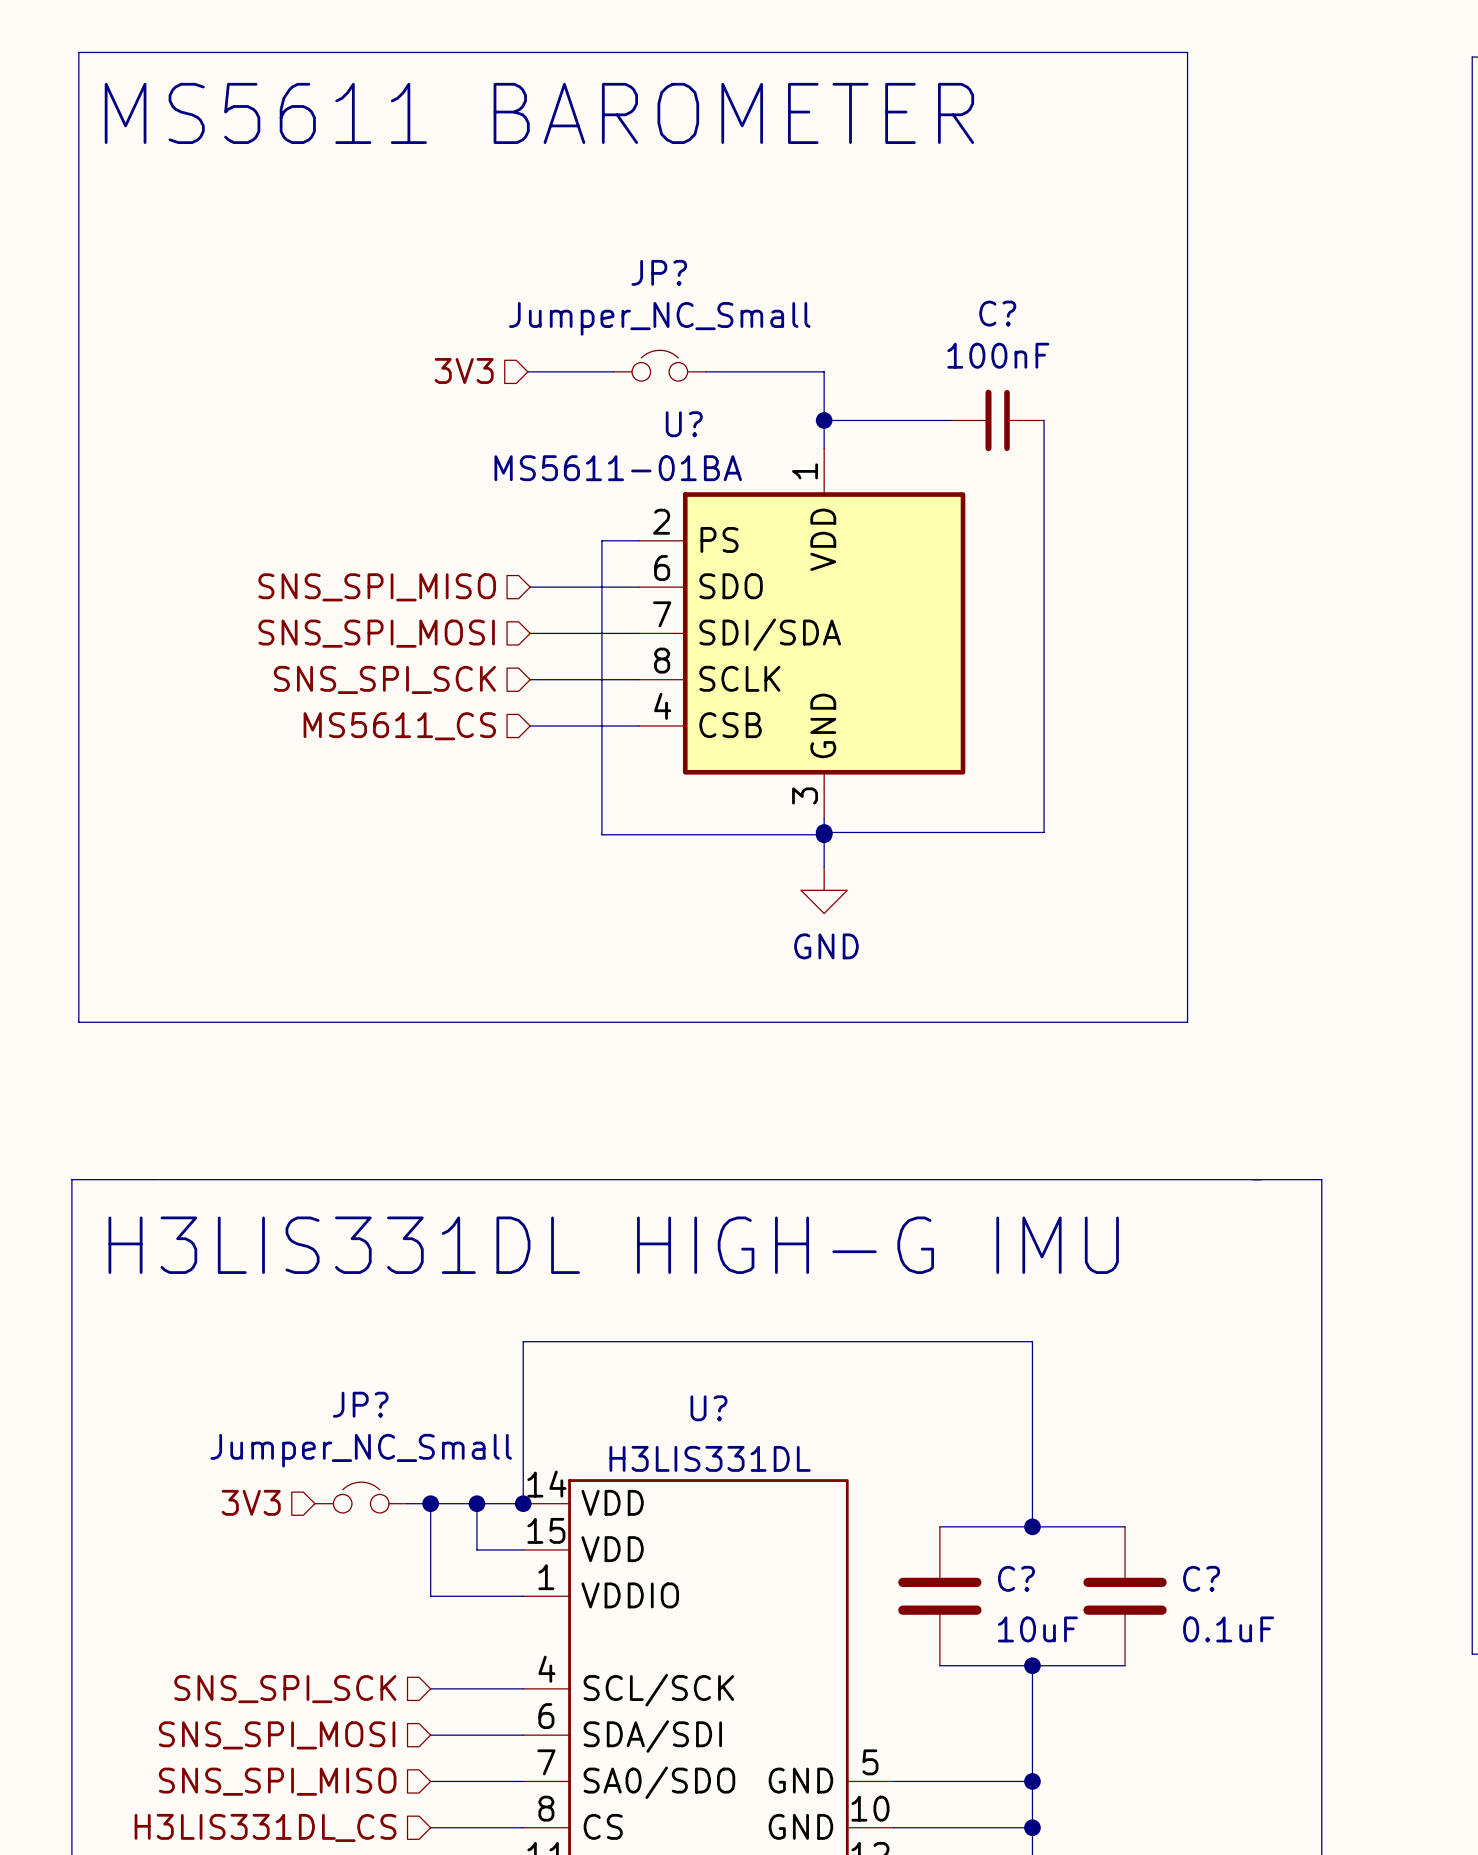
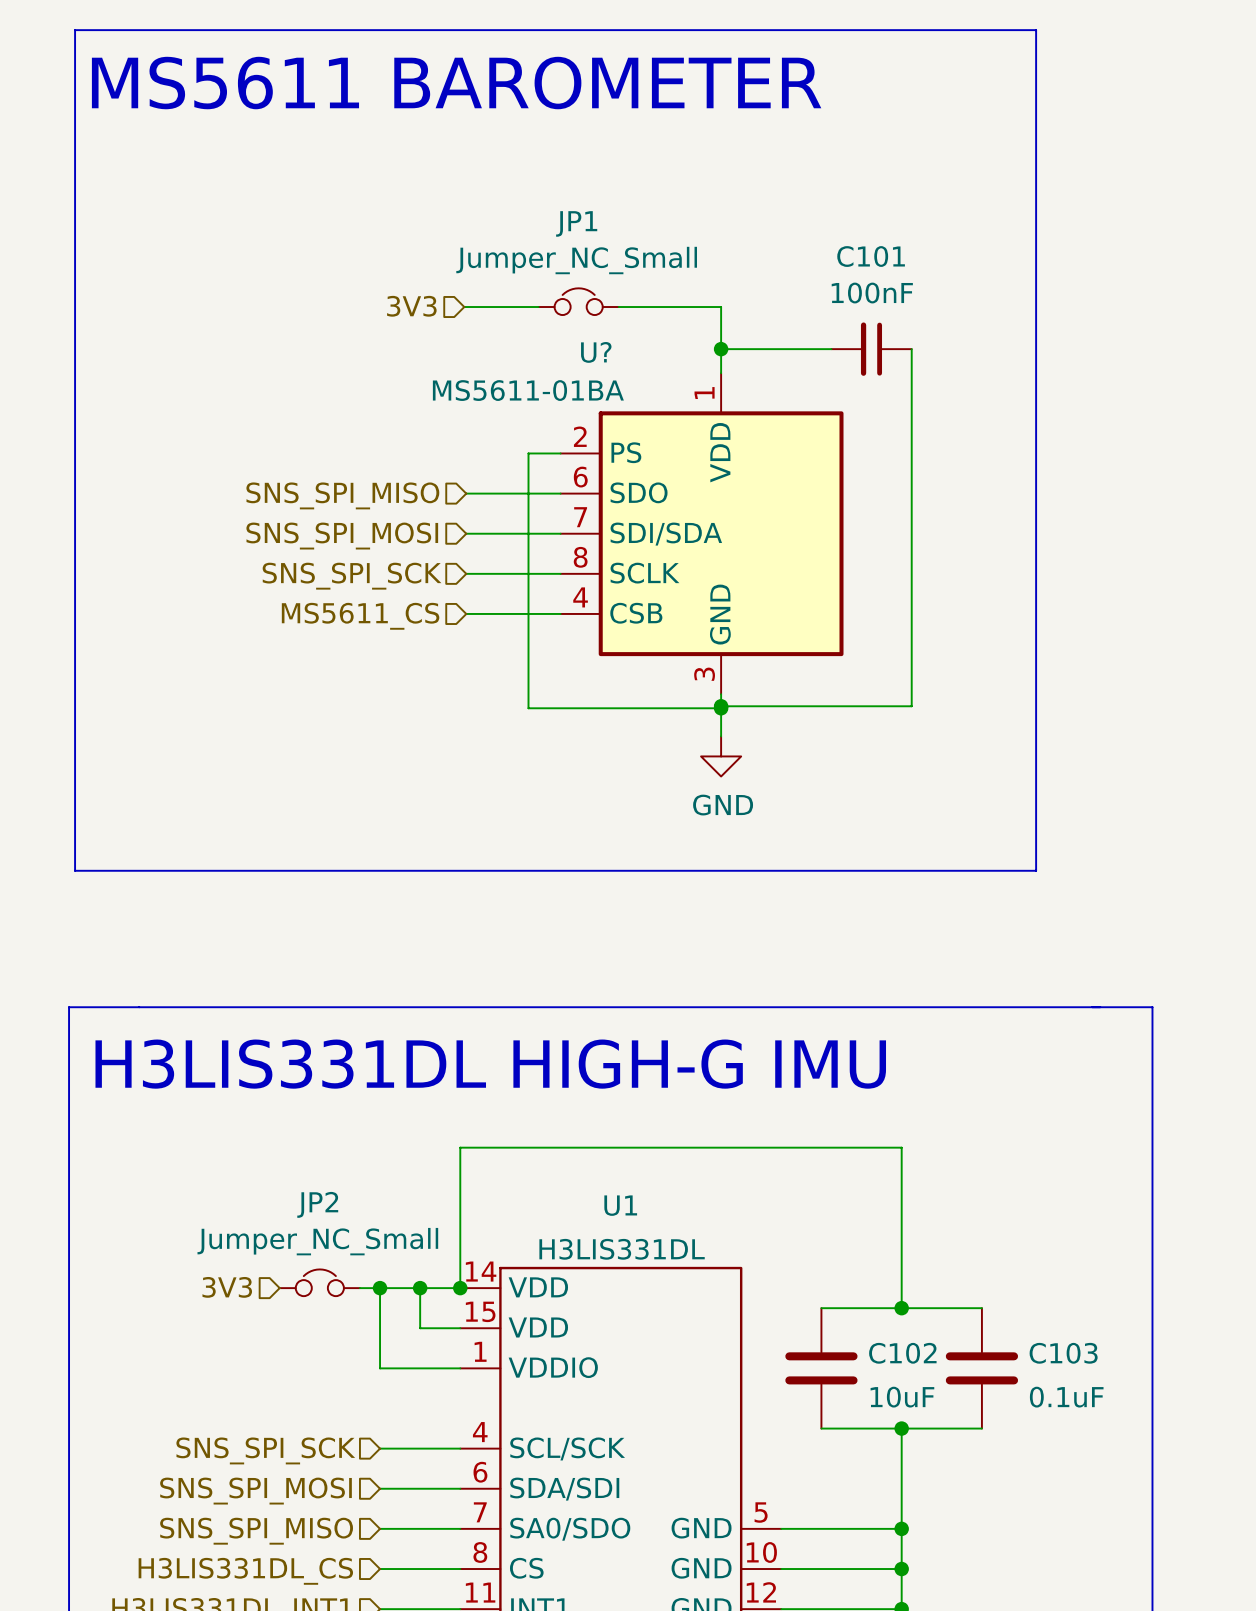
JP? name: JP? (659, 272) -> JP1 (576, 223)
C? name: C? (997, 313) -> C101 (871, 256)
JP? name: JP? (360, 1404) -> JP2 (317, 1204)
U? name: U? (708, 1408) -> U1 (620, 1205)
C? name: C? (1016, 1578) -> C102 (902, 1353)
C? name: C? (1201, 1578) -> C103 (1063, 1353)

